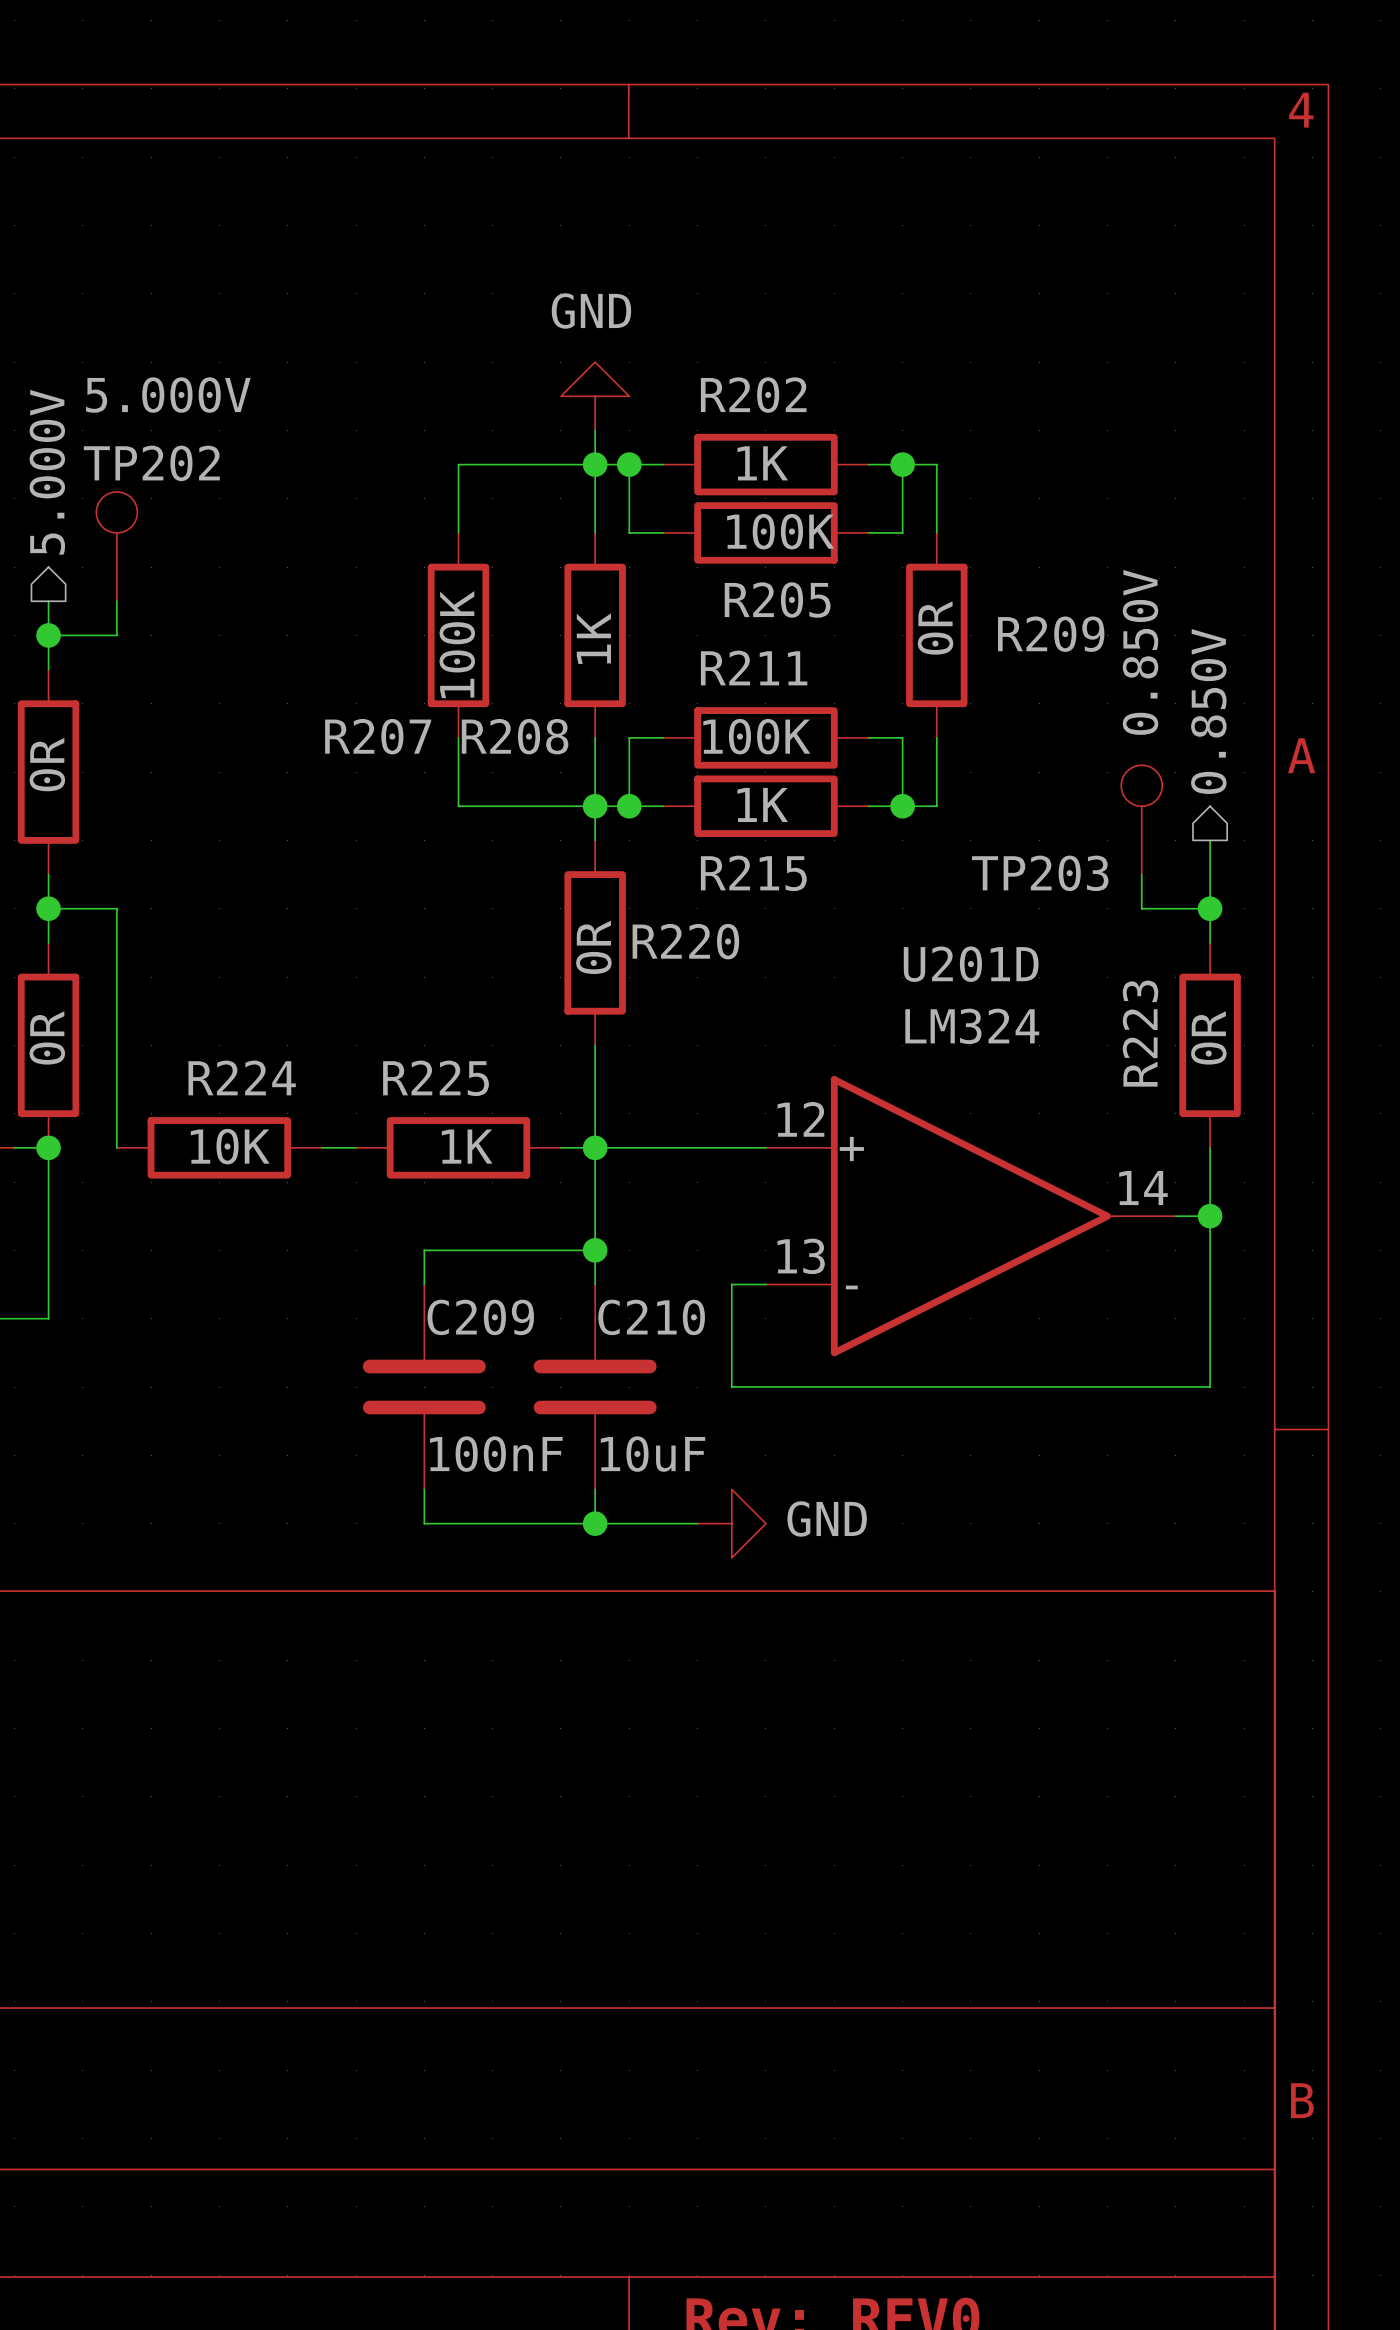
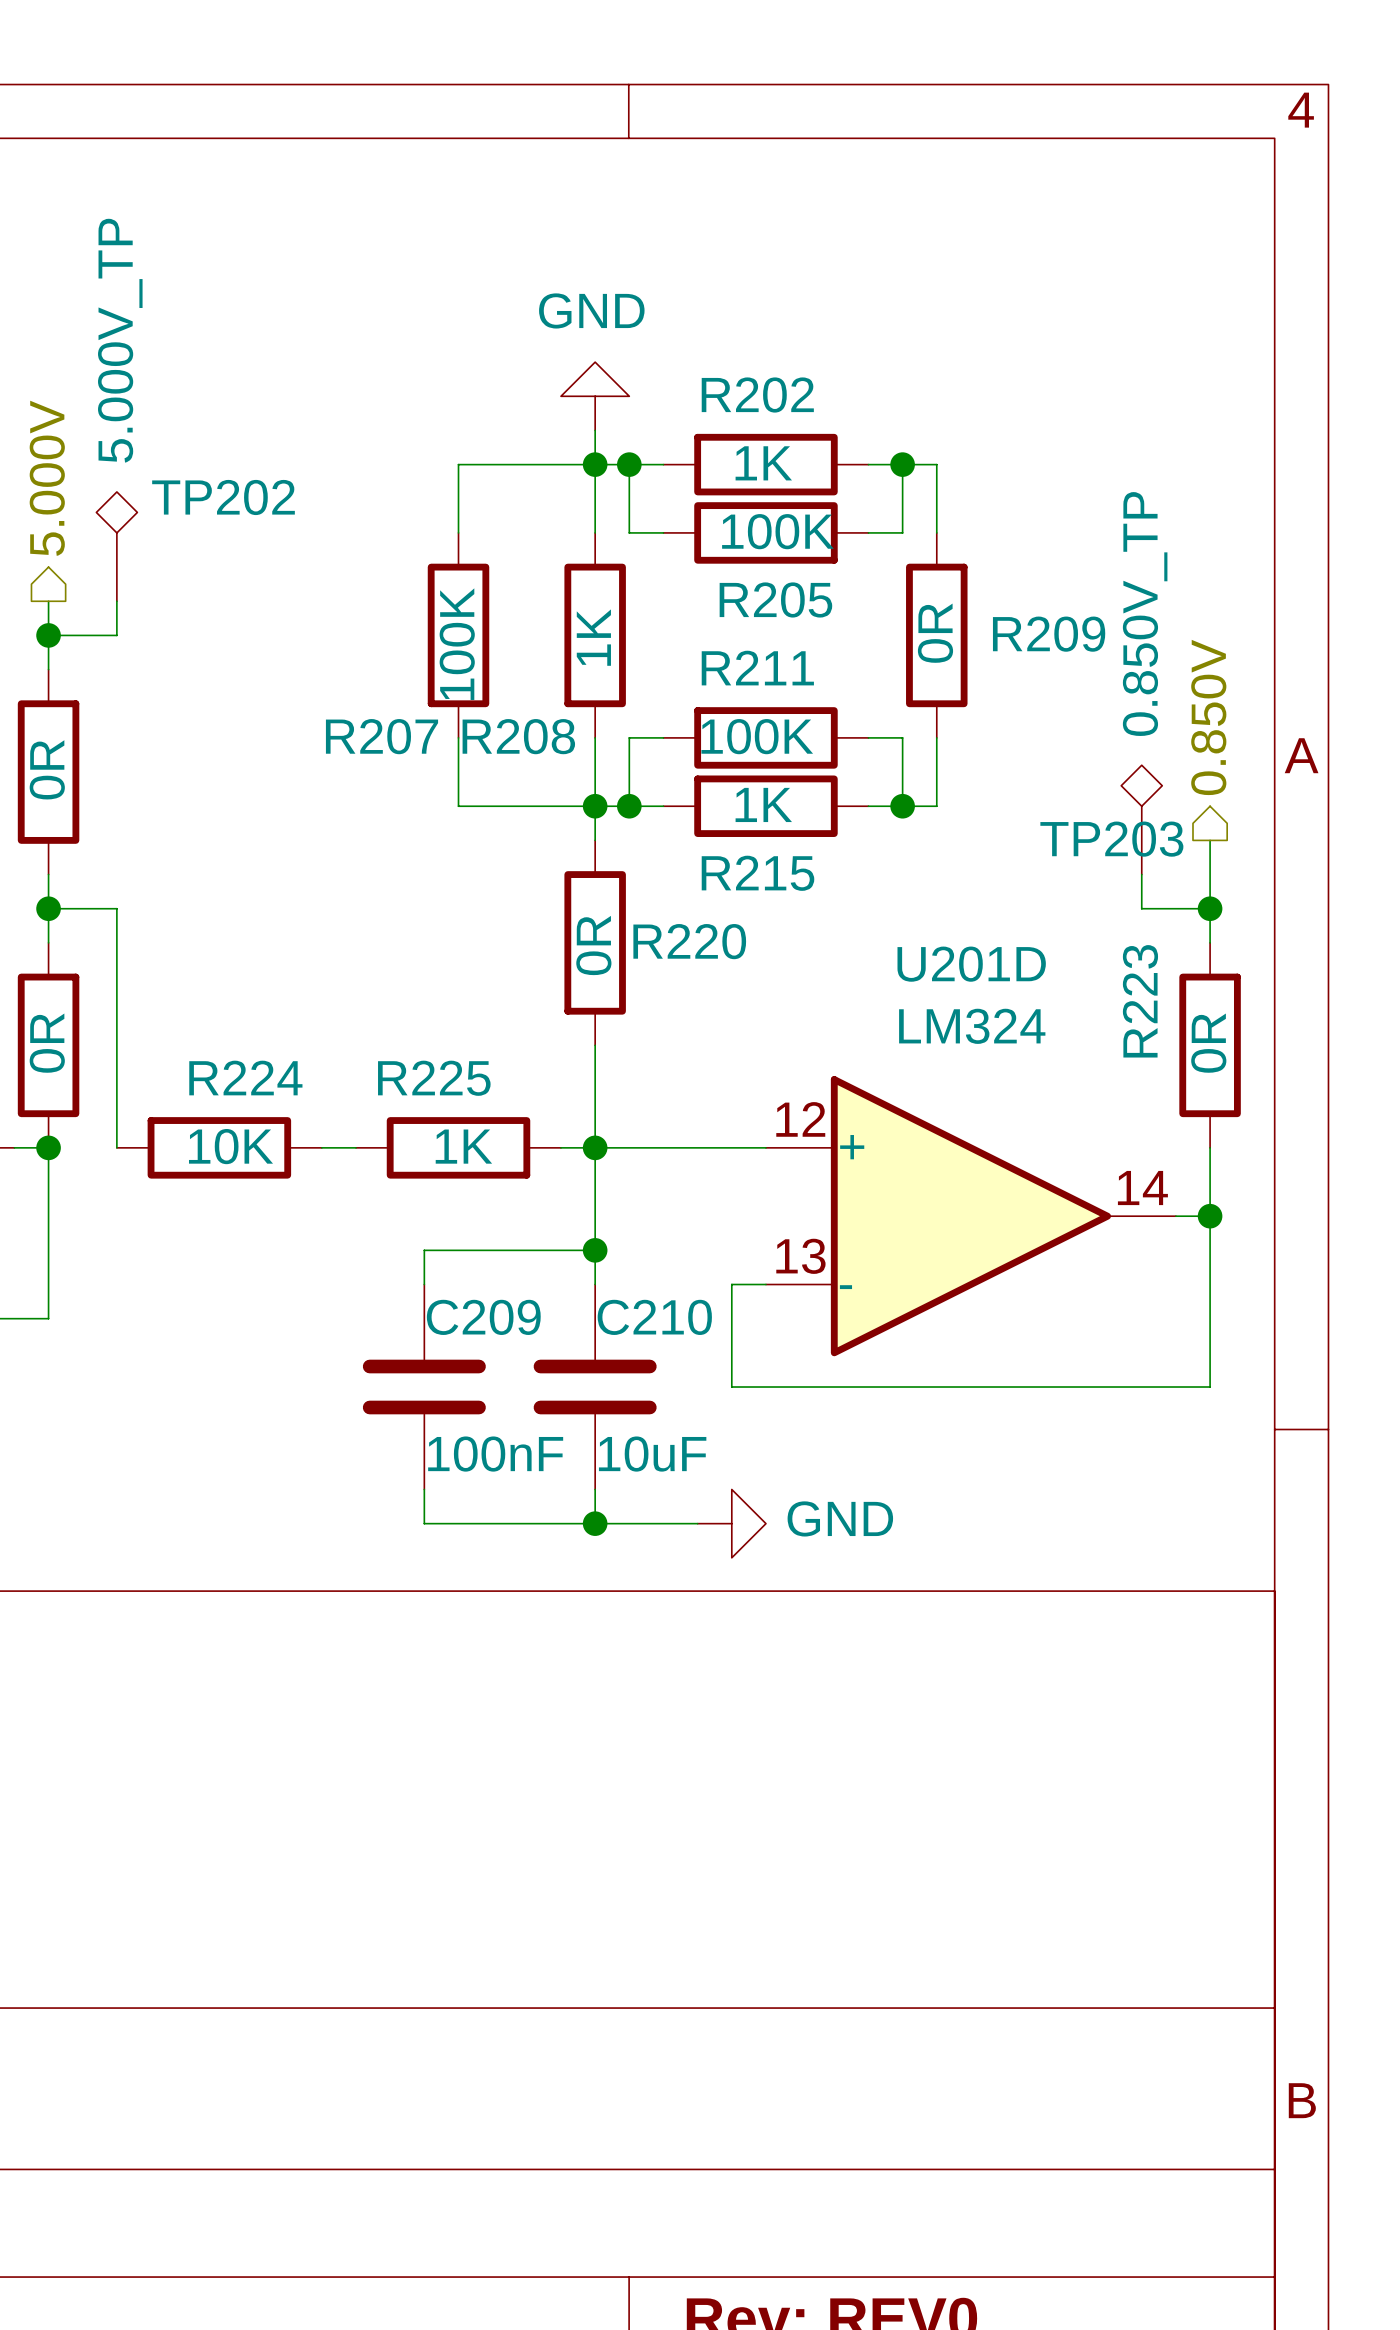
TP202 value: 5.000V (168, 395) -> 5.000V_TP (120, 340)
TP202 name position: TP202 (151, 463) -> TP202 (223, 497)
TP202 symbol: [96, 491, 138, 602] -> [96, 491, 138, 602]
TP203 value: 0.850V (1140, 652) -> 0.850V_TP (1145, 614)
TP203 symbol: [1121, 765, 1163, 875] -> [1121, 765, 1163, 875]
TP203 name position: TP203 (1040, 873) -> TP203 (1111, 839)
R223 name position: R223 (1140, 1033) -> R223 (1140, 1001)

